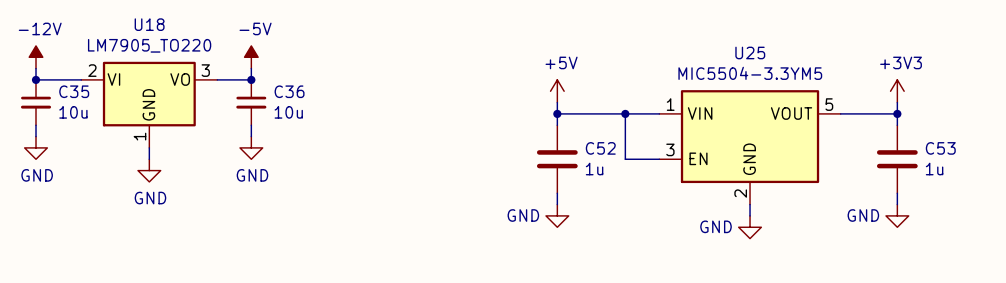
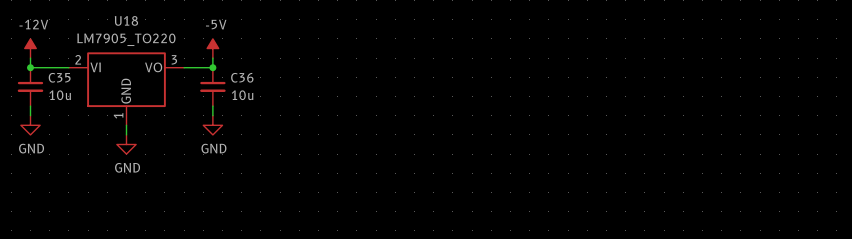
power symbol: +5V (557, 91) -> none
power symbol: +3V3 (897, 91) -> none
wire: (557, 102) (557, 125) -> none
wire: (897, 102) (897, 125) -> none
wire: (557, 113) (659, 113) -> none
junction: (557, 113) -> none
wire: (625, 113) (625, 159) (659, 159) -> none
junction: (625, 113) -> none
wire: (840, 113) (897, 113) -> none
junction: (897, 113) -> none
U25: MIC5504-3.3YM5 (750, 147) -> none
C52: 1u (557, 159) -> none
C53: 1u (897, 159) -> none
wire: (557, 193) (557, 204) -> none
wire: (897, 193) (897, 204) -> none
wire: (750, 204) (750, 215) -> none
power symbol: GND (557, 215) -> none
power symbol: GND (897, 215) -> none
power symbol: GND (750, 227) -> none

